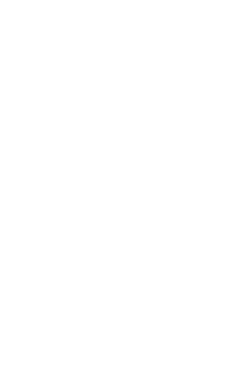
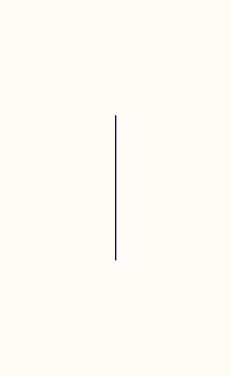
wire: none -> (115, 115) (115, 259)

